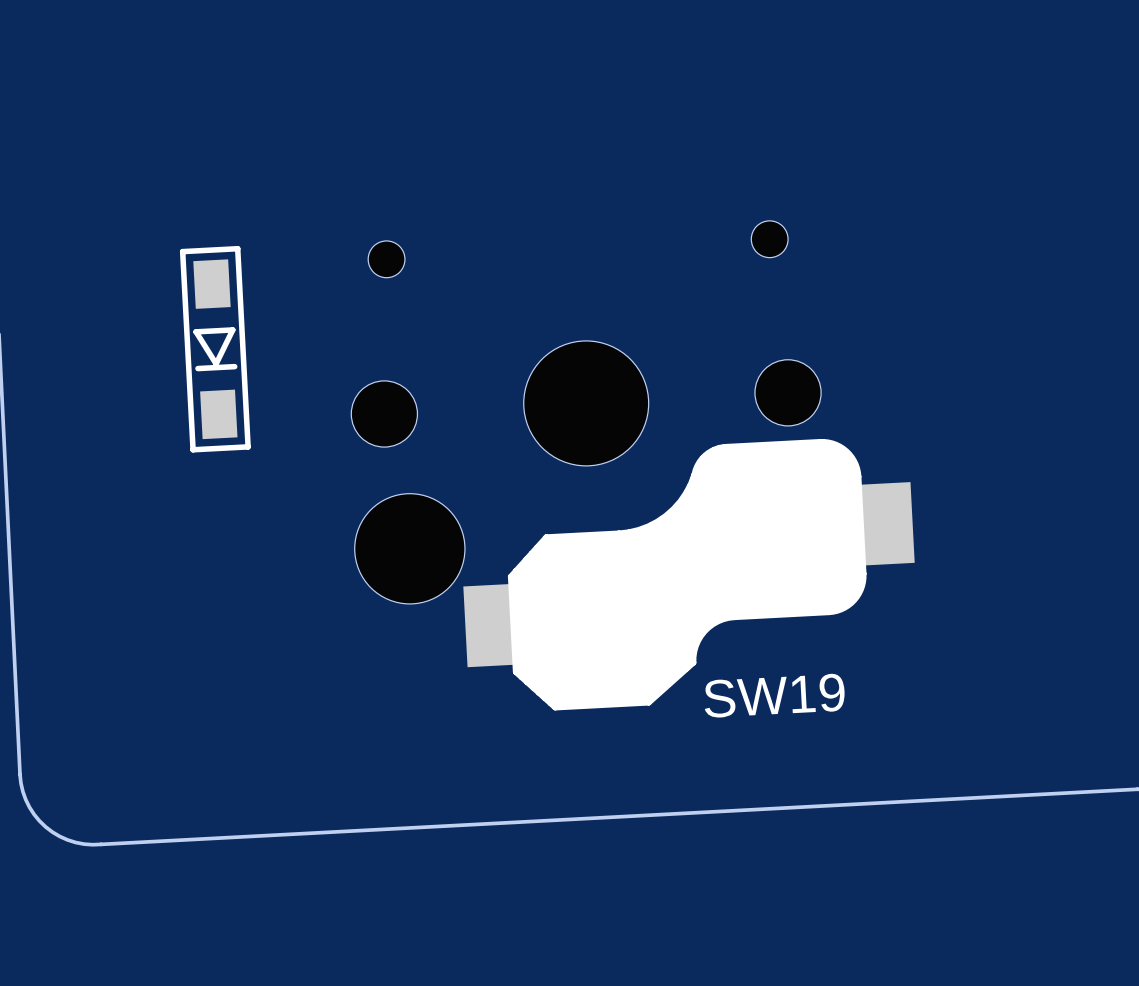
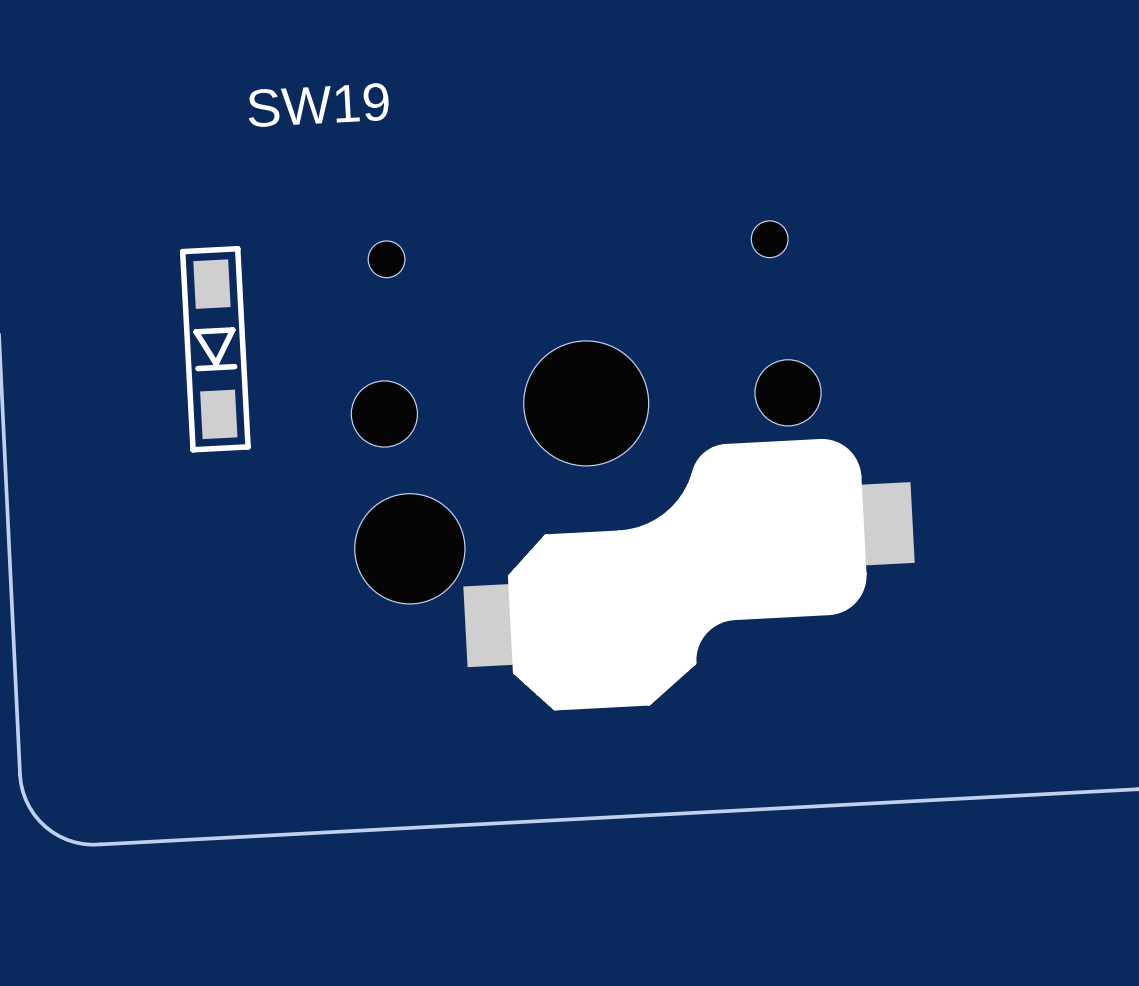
SW19 name position: SW19 (774, 695) -> SW19 (318, 105)

